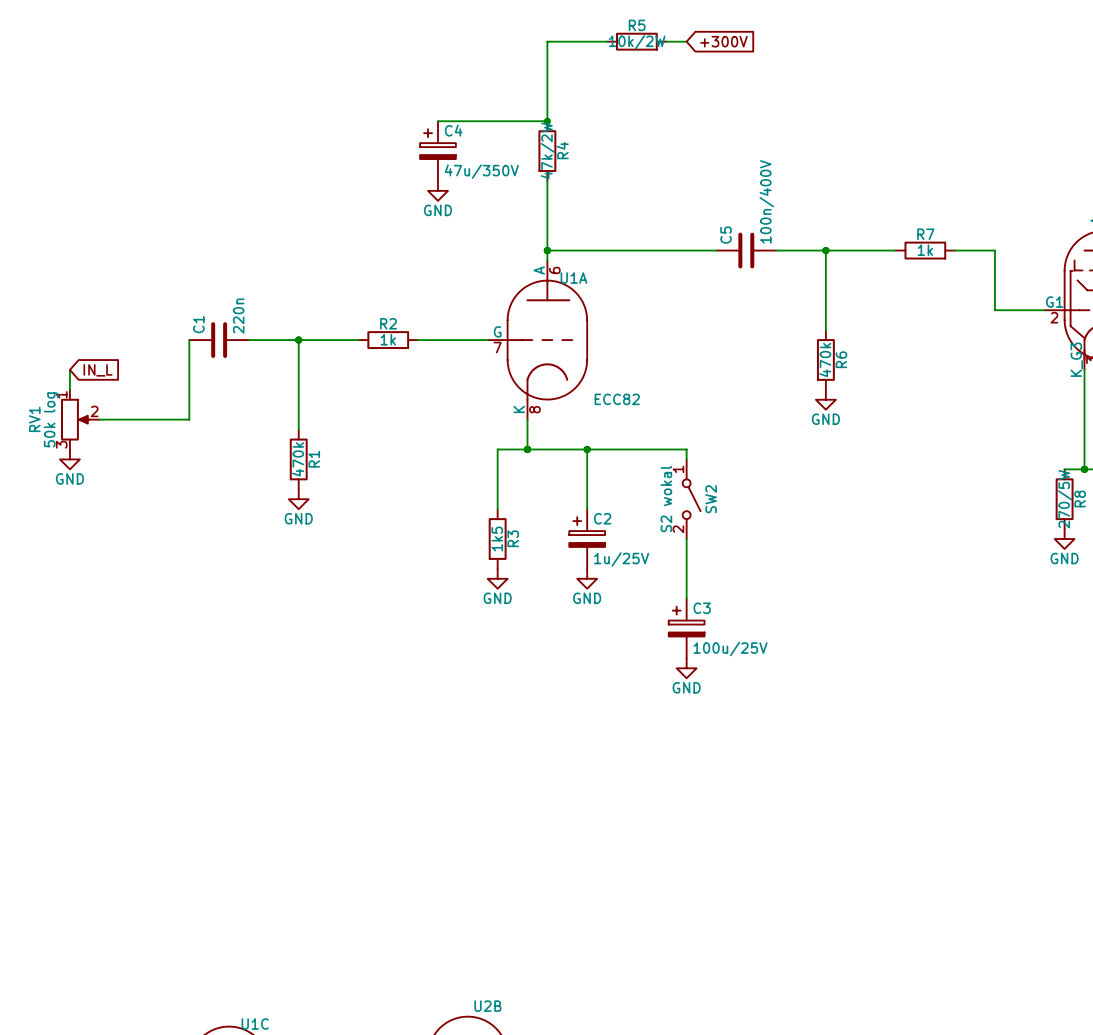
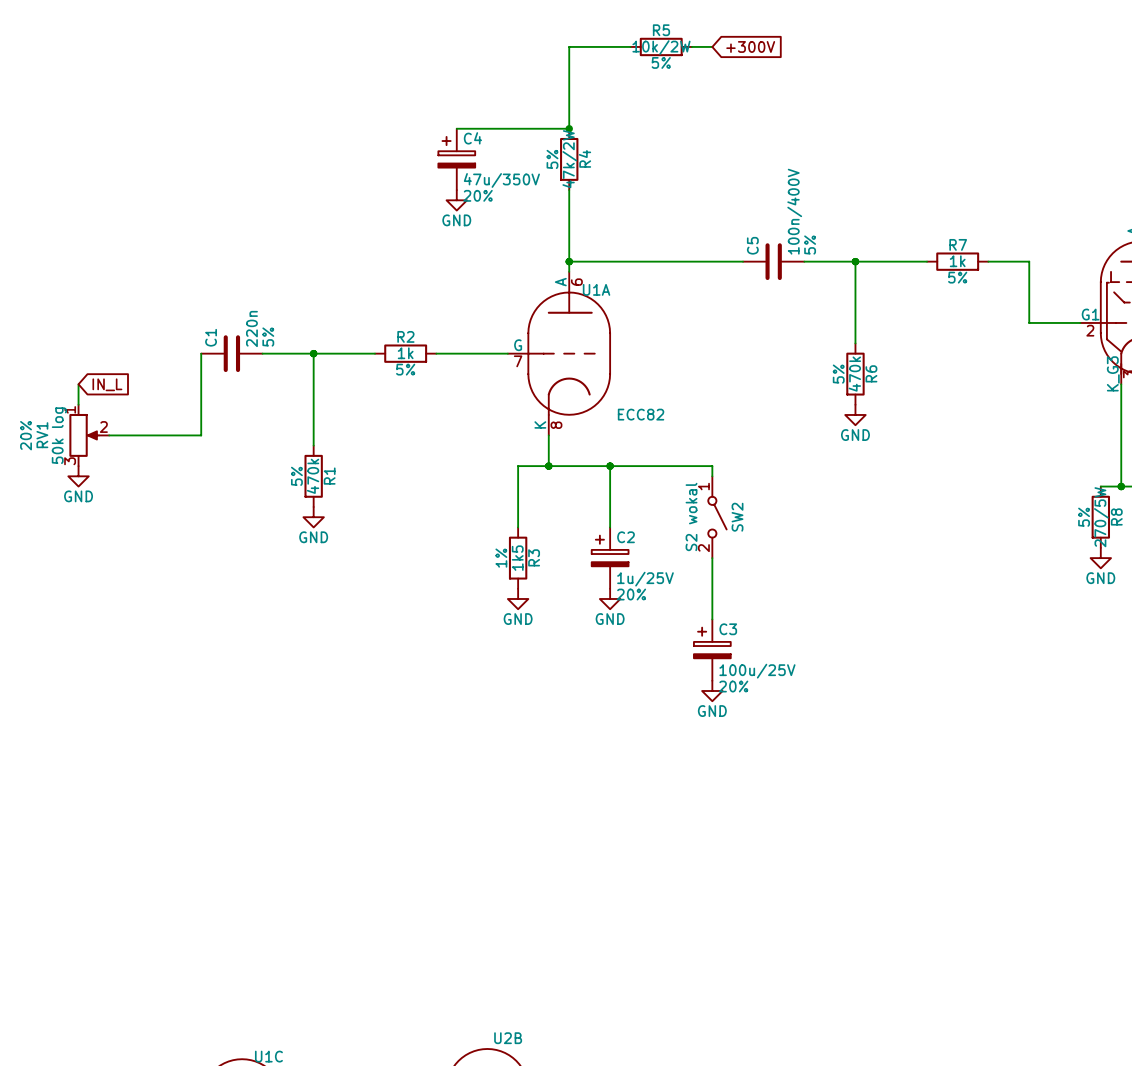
R5 text: none -> 5% (661, 62)
R4 text: none -> 5% (552, 159)
C4 text: none -> 20% (478, 195)
C5 text: none -> 5% (810, 245)
R7 text: none -> 5% (957, 277)
C1 text: none -> 5% (268, 337)
R2 text: none -> 5% (405, 369)
R6 text: none -> 5% (838, 374)
RV1 text: none -> 20% (26, 435)
R1 text: none -> 5% (296, 476)
R8 text: none -> 5% (1084, 517)
R3 text: none -> 1% (501, 558)
C2 text: none -> 20% (631, 594)
C3 text: none -> 20% (733, 686)

